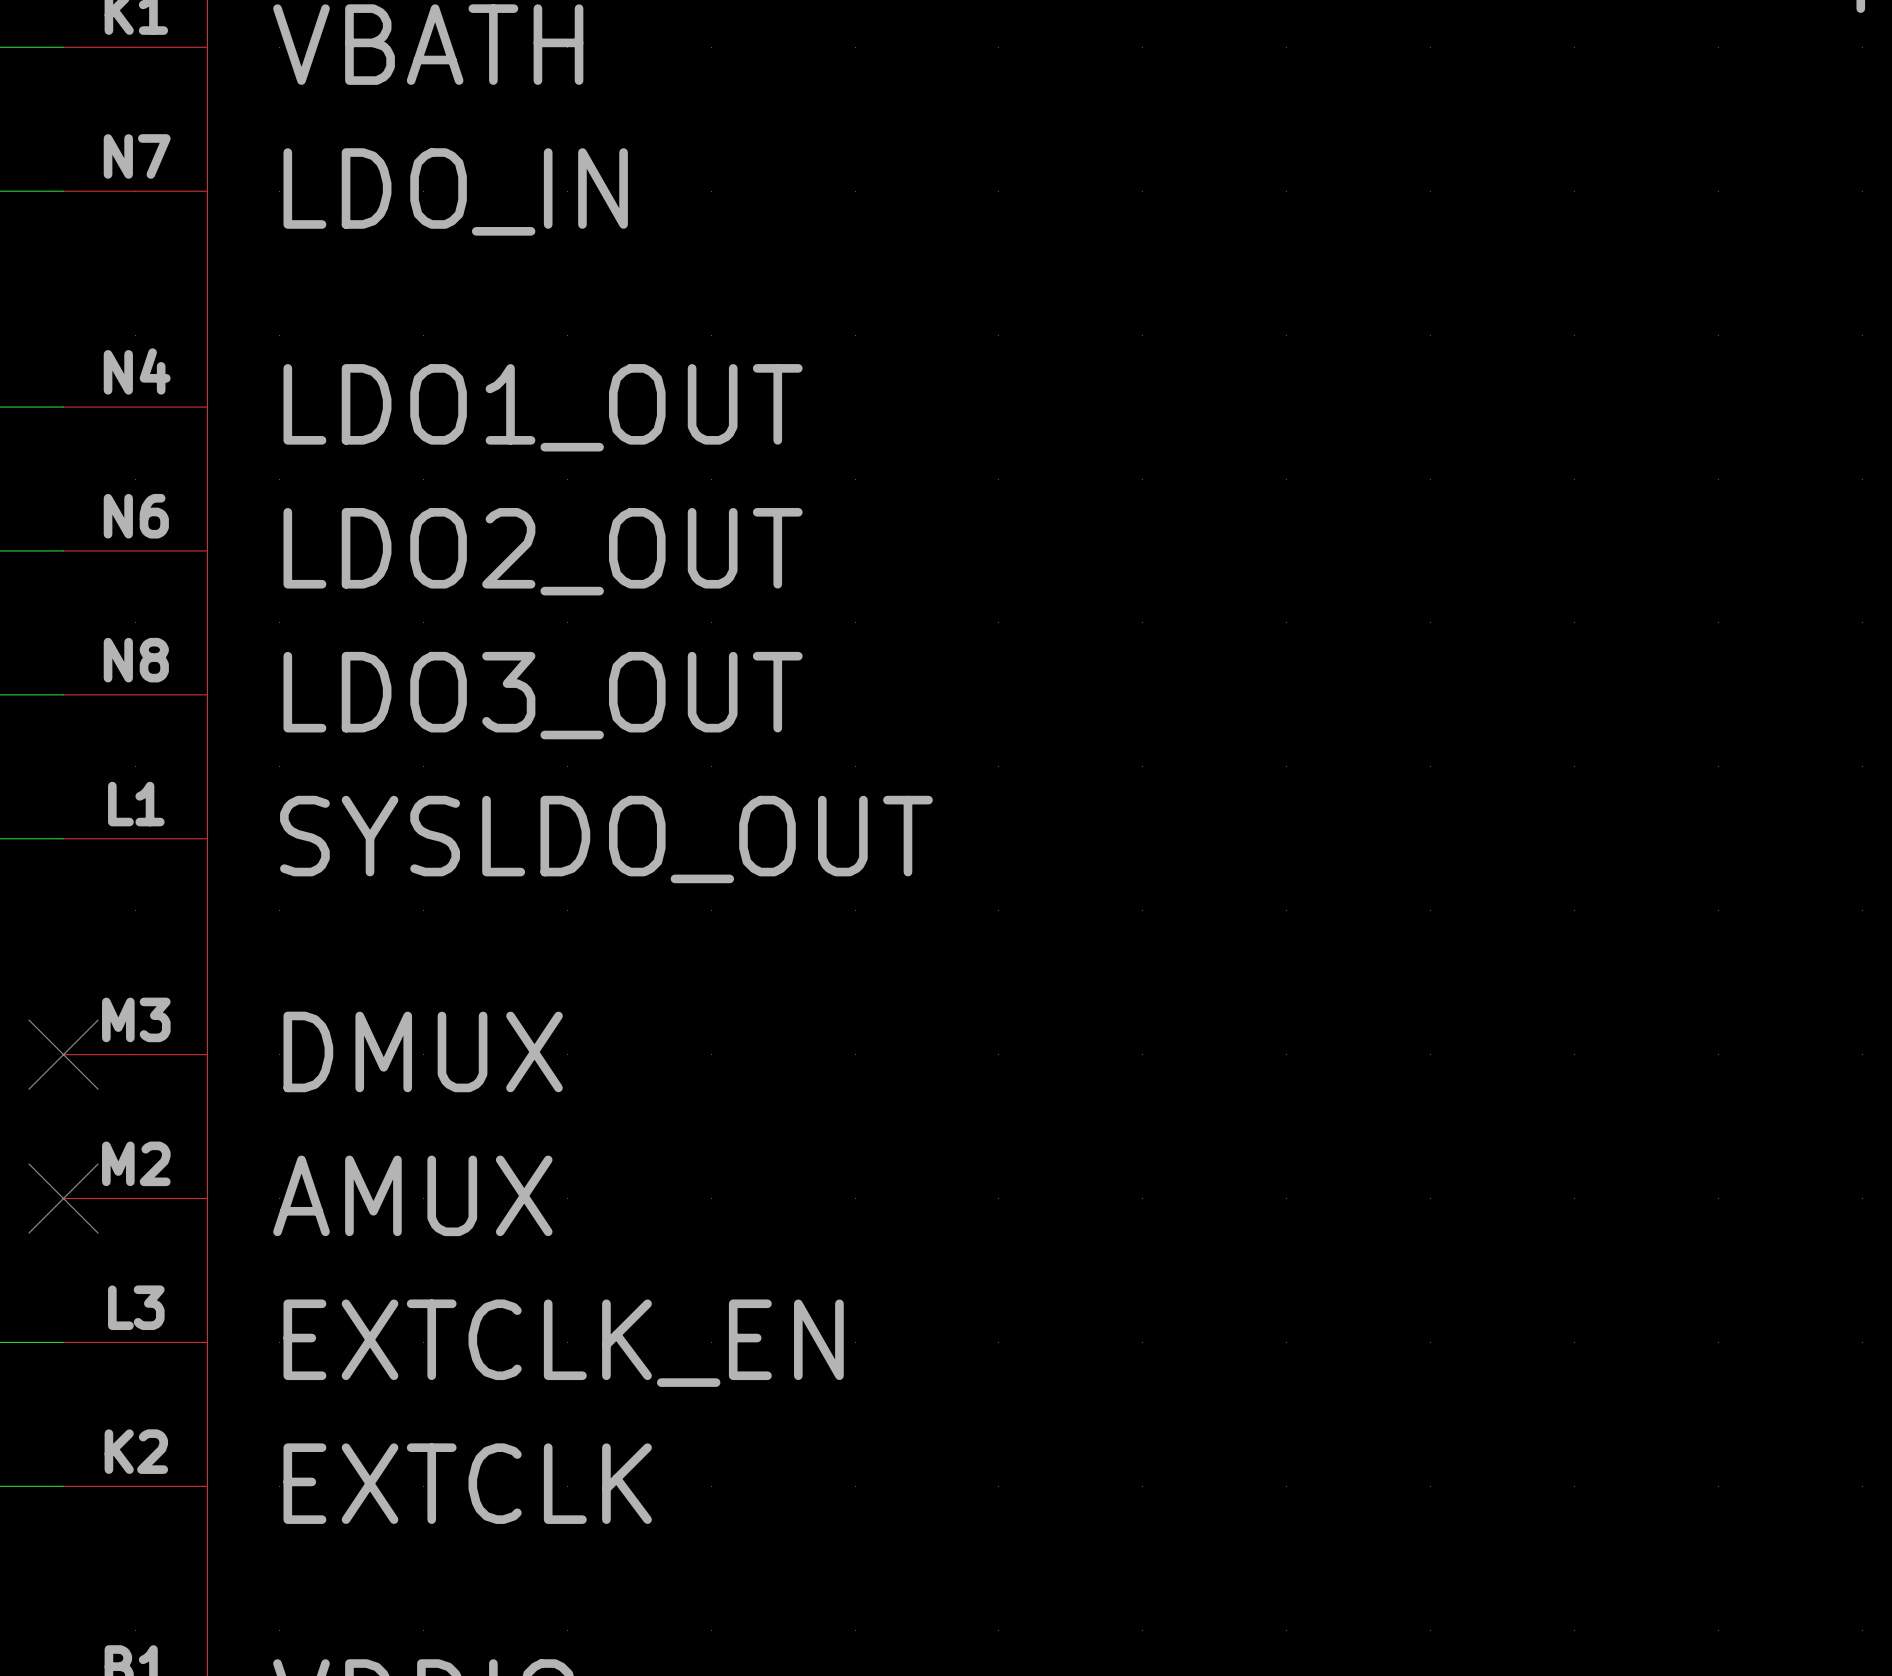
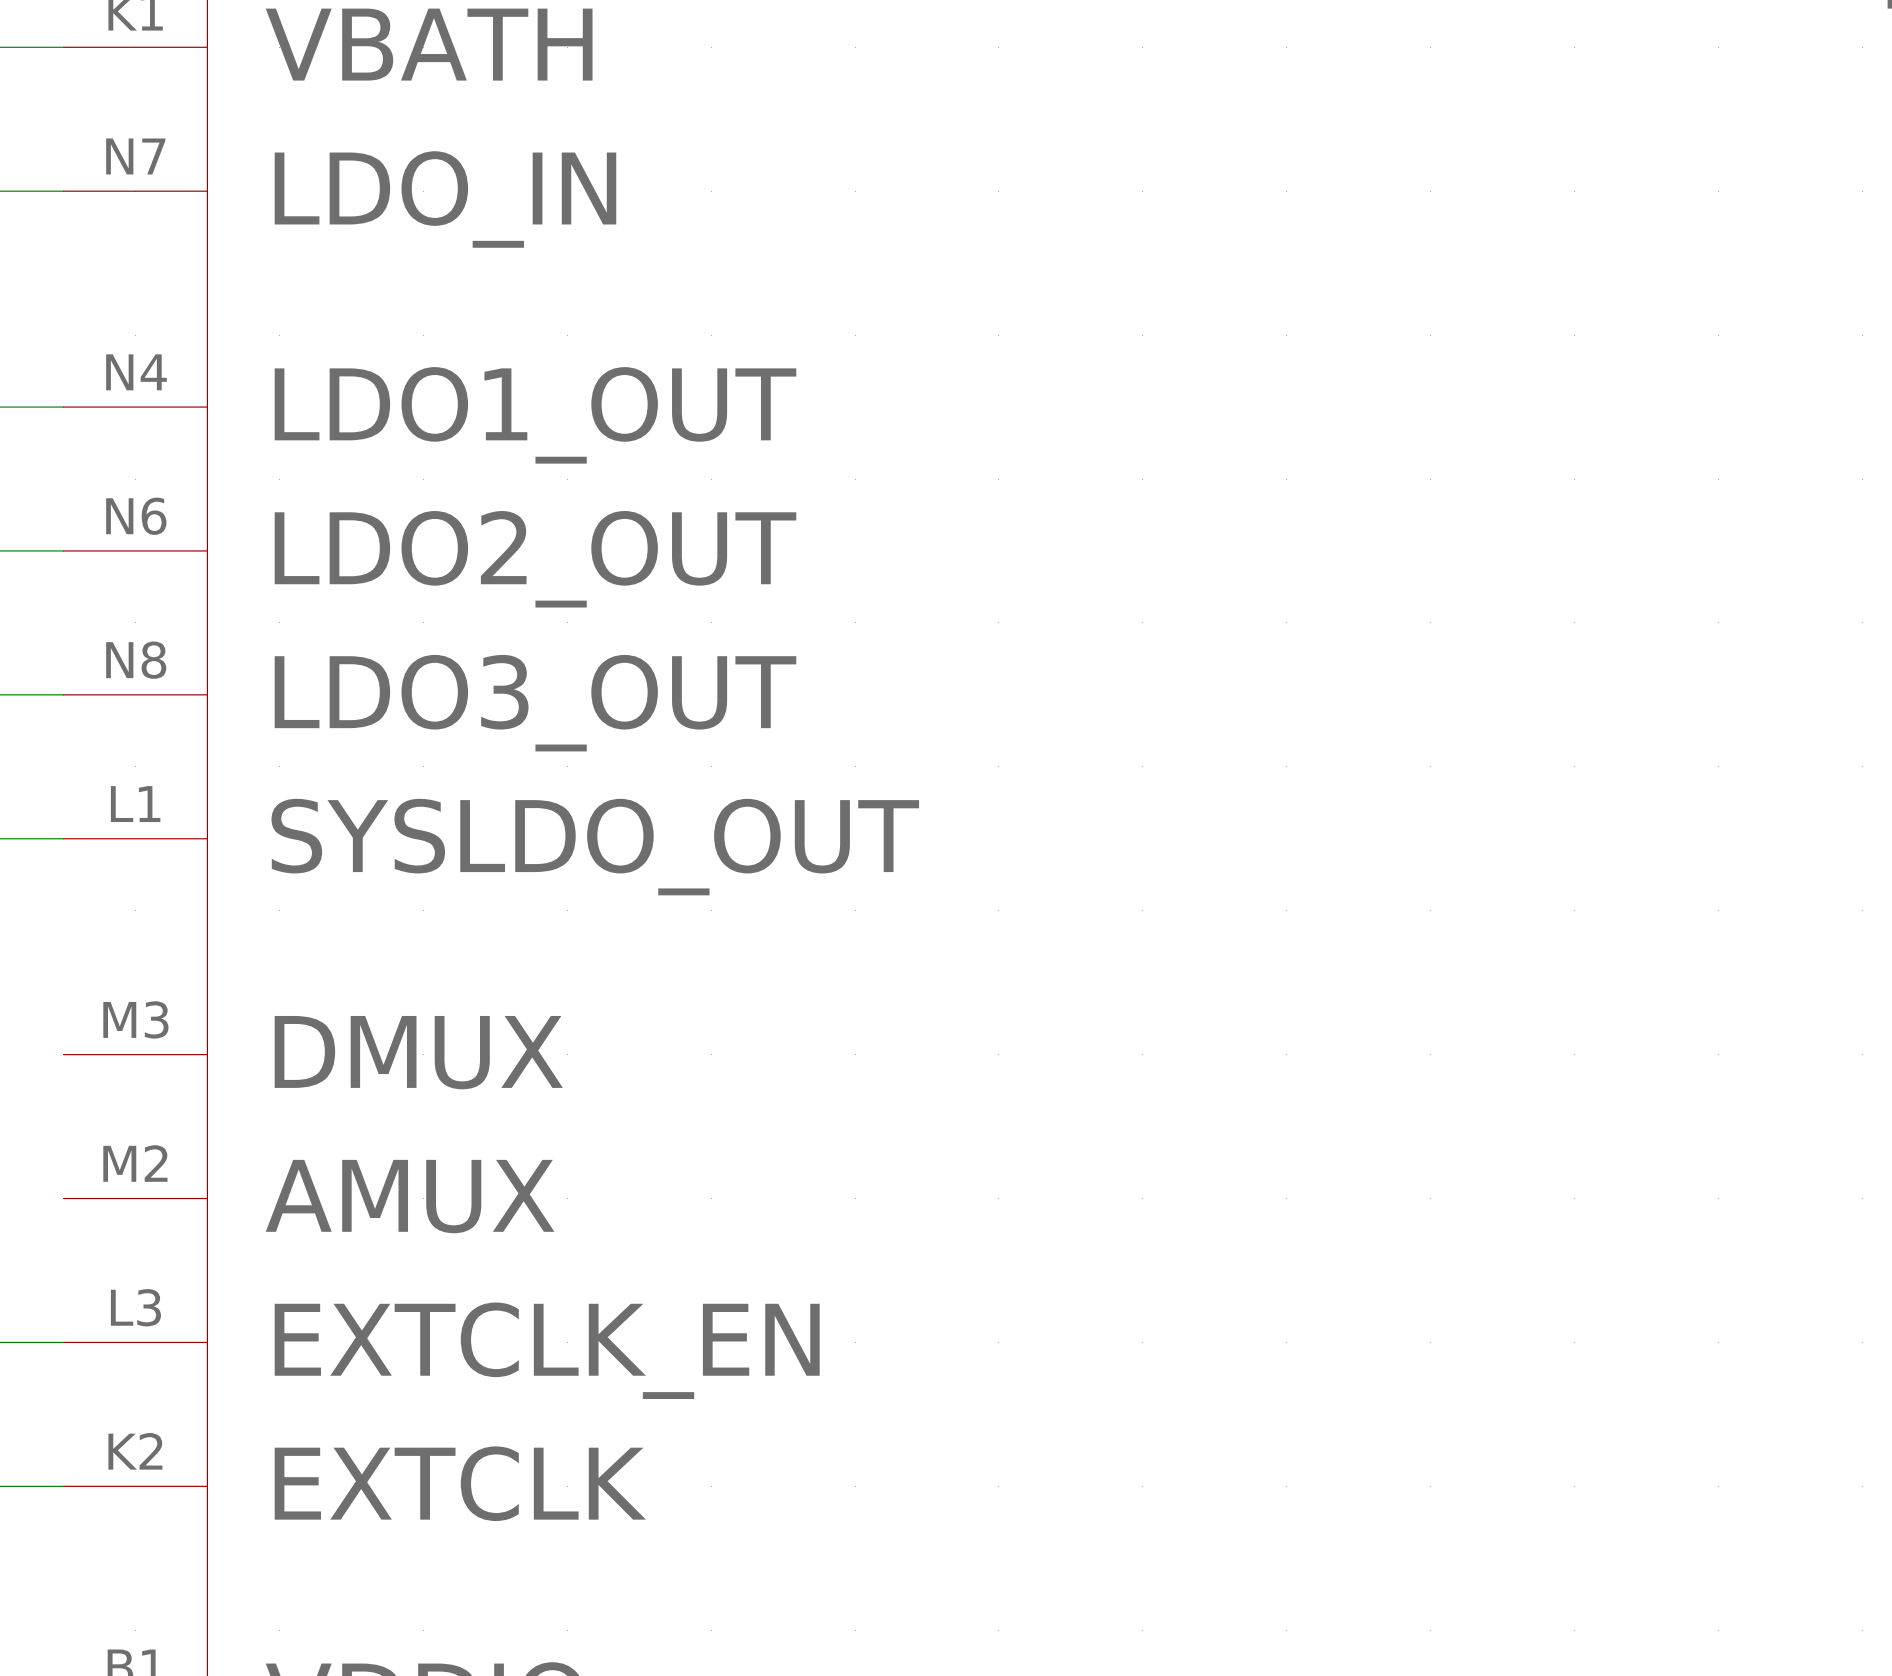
no-connect mark: (63, 1054) -> none
no-connect mark: (63, 1198) -> none

